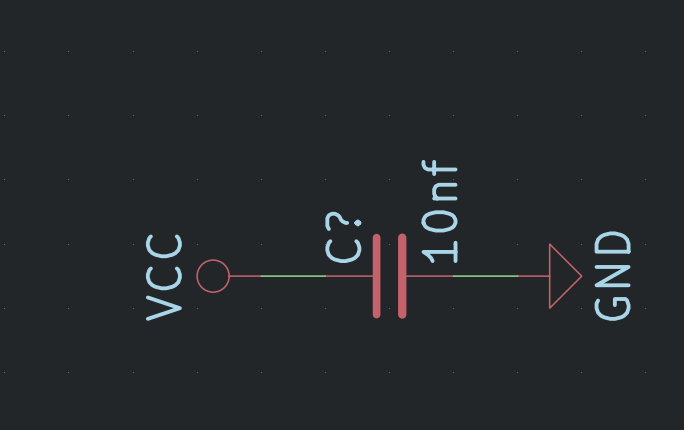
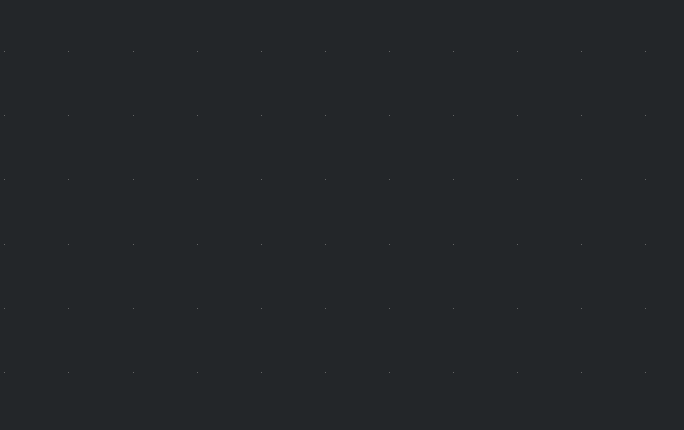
power symbol: VCC (229, 276) -> none
wire: (261, 276) (325, 276) -> none
C?: 10nf (389, 276) -> none
wire: (453, 276) (517, 276) -> none
power symbol: GND (549, 276) -> none

